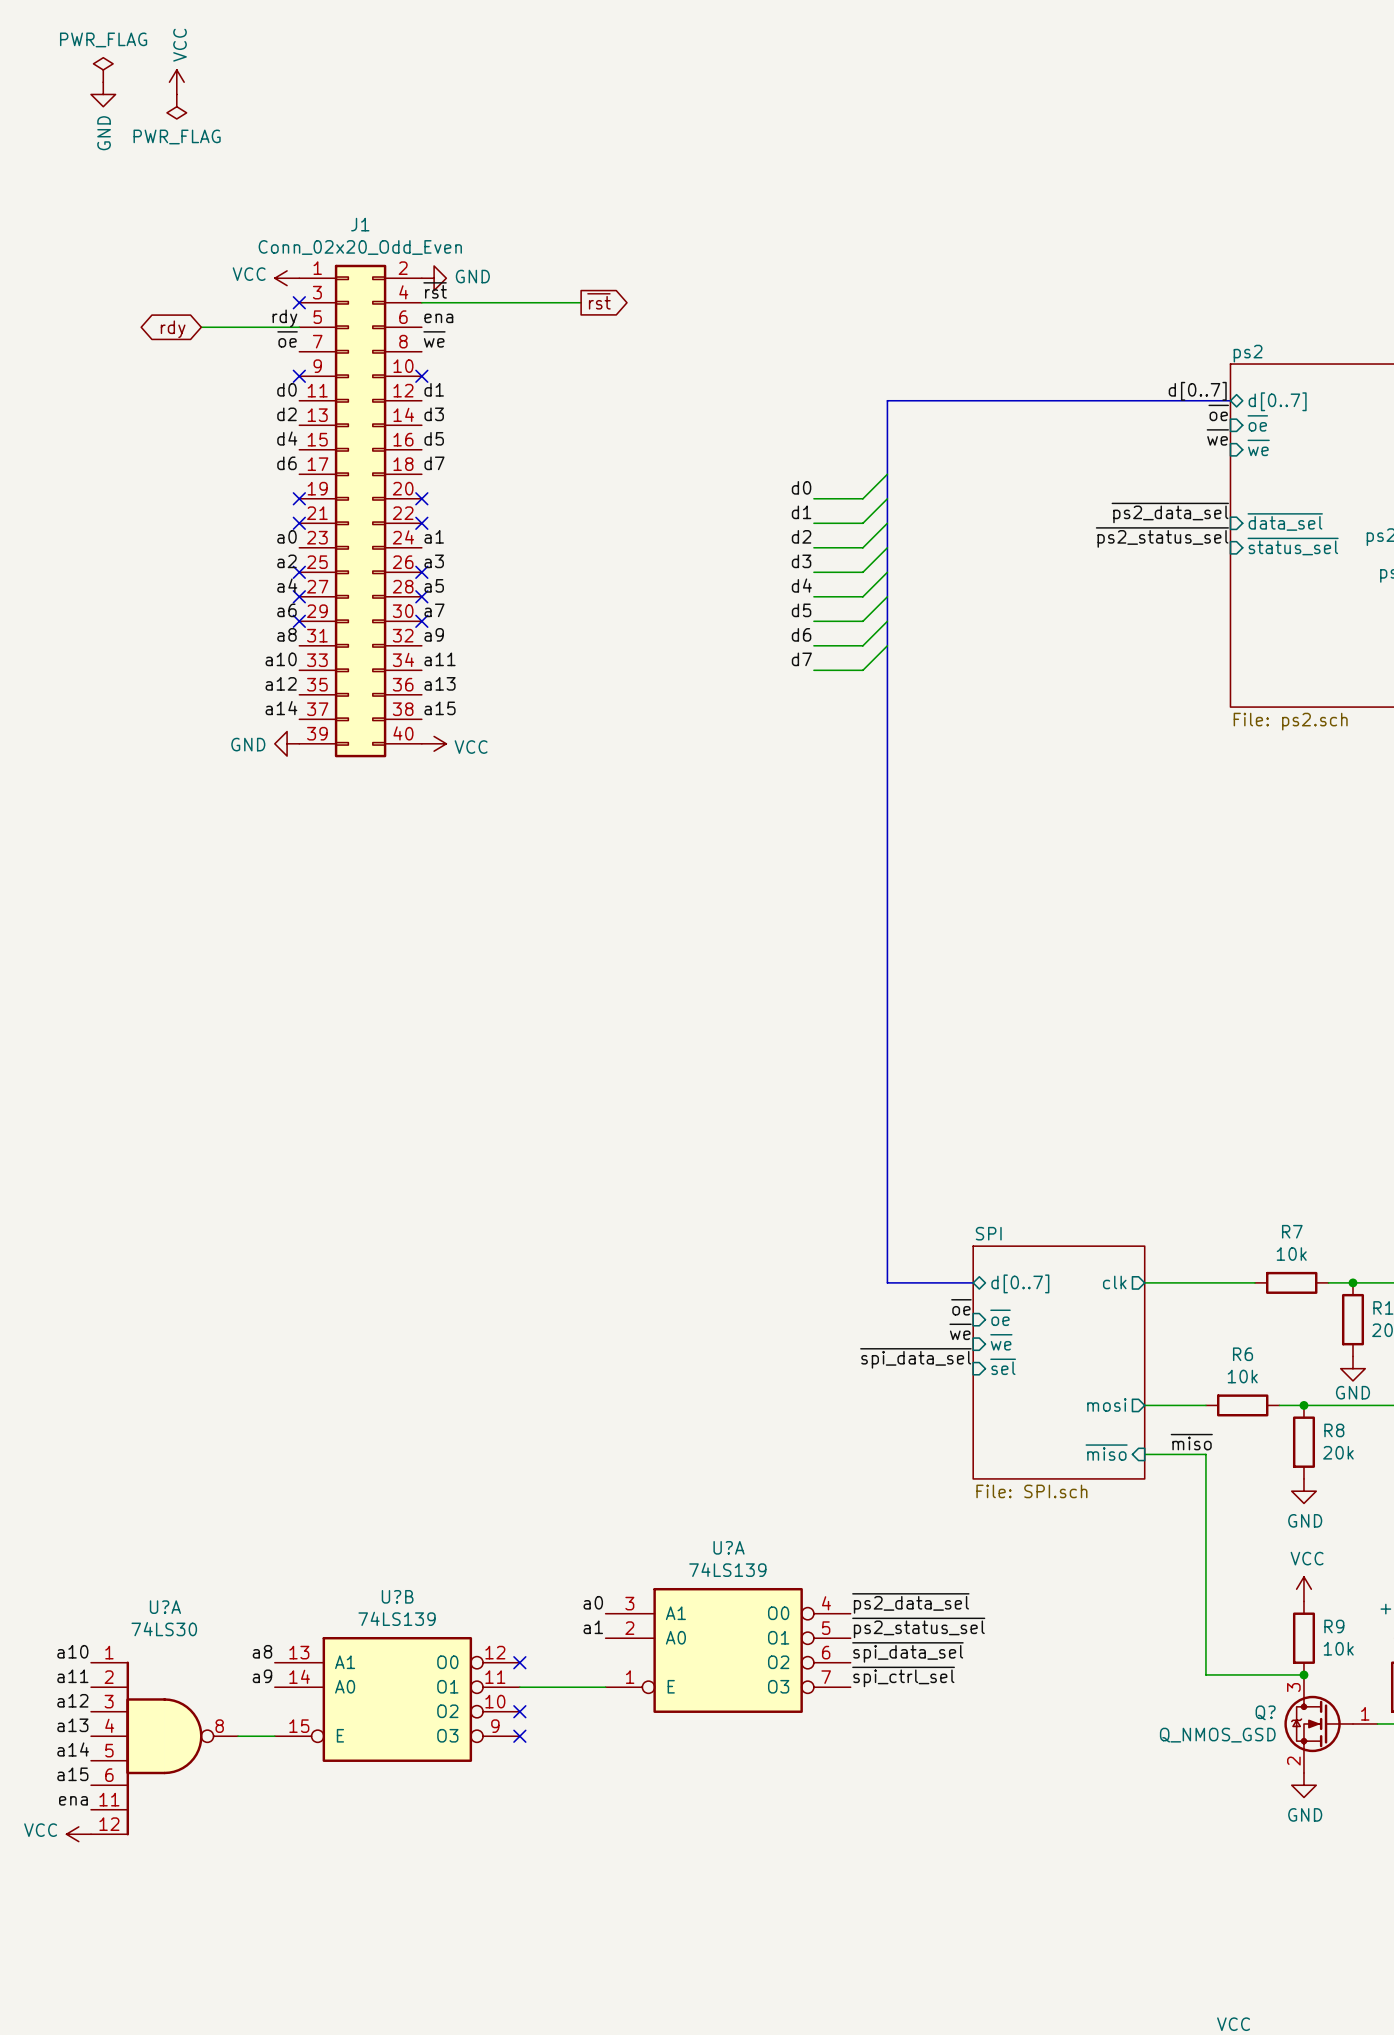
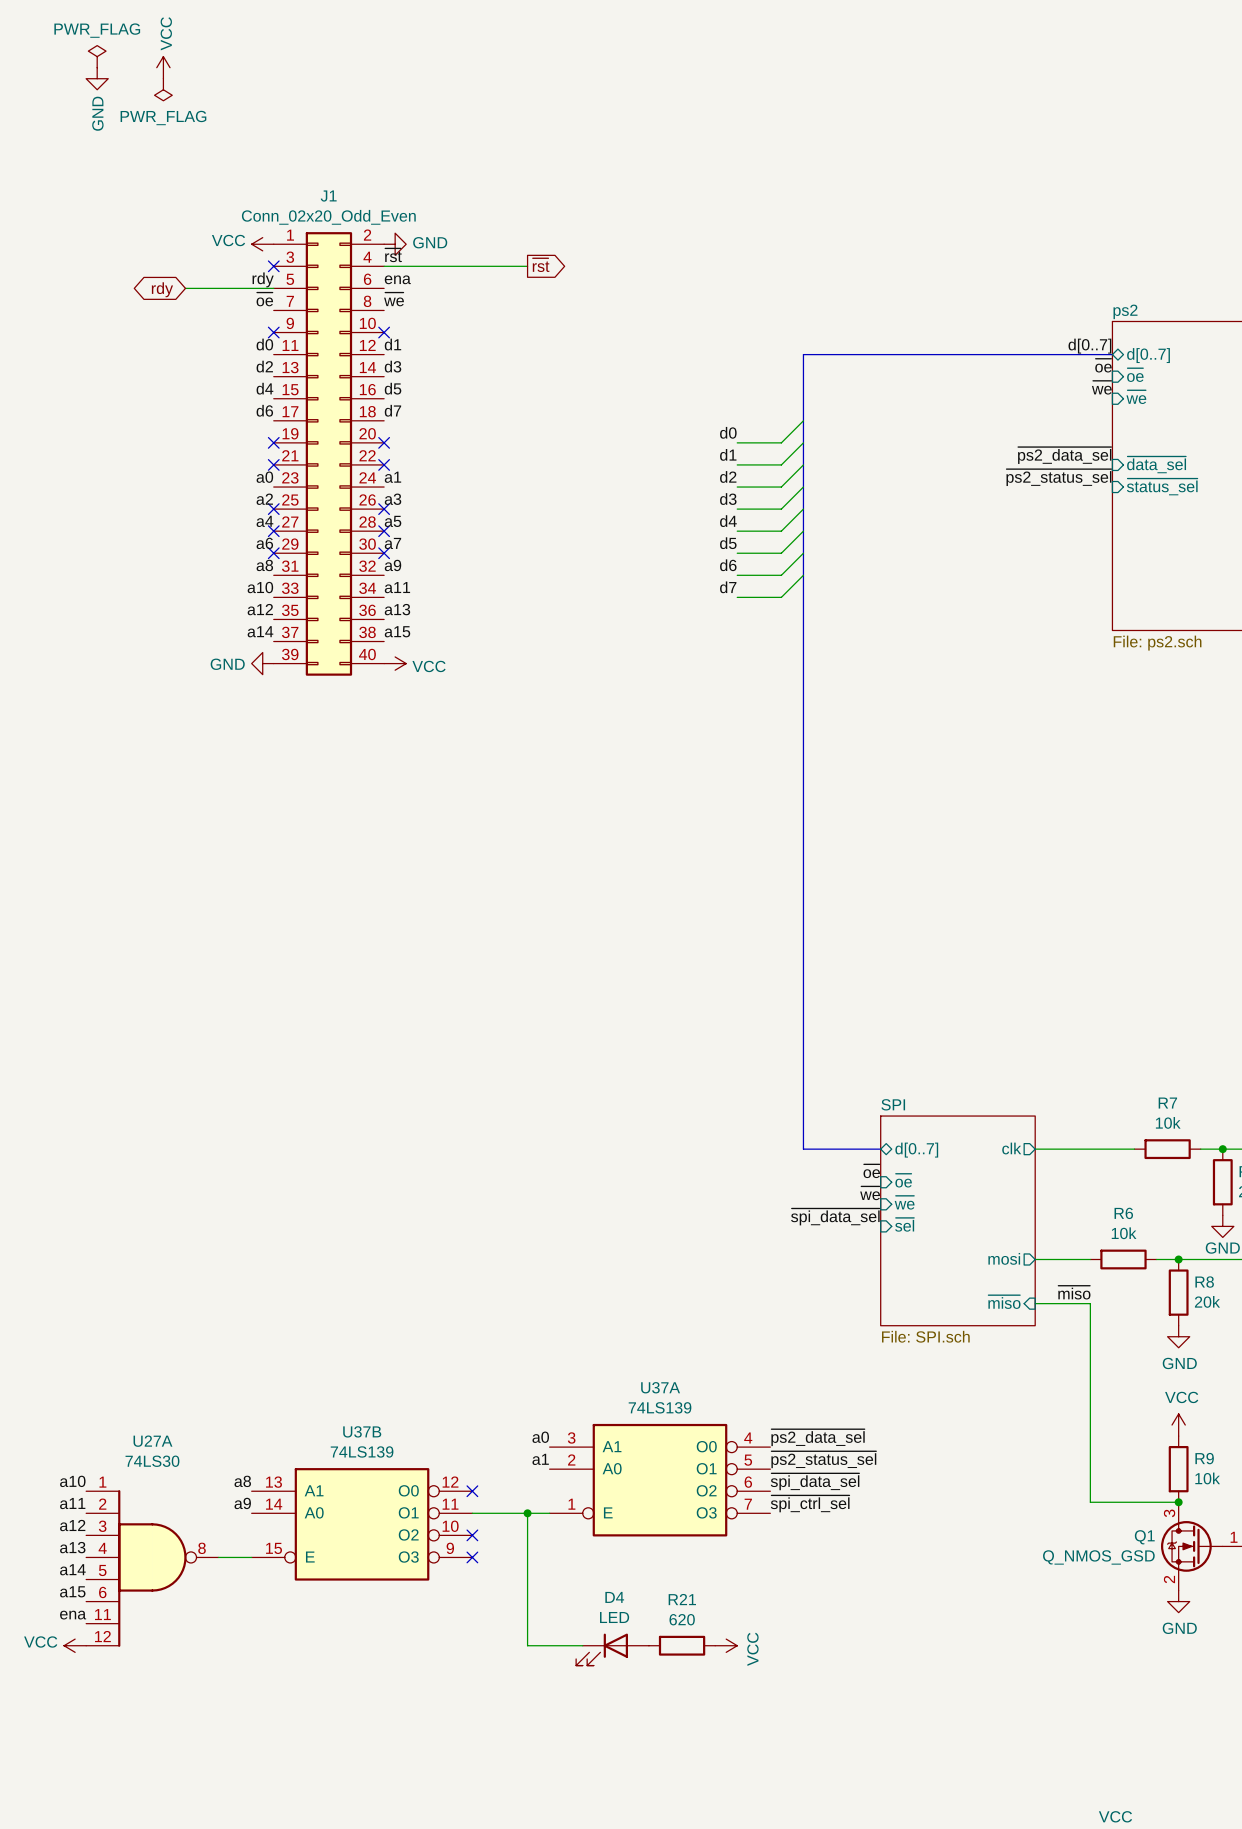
U?A name: U?A (729, 1547) -> U37A (660, 1387)
U?B name: U?B (397, 1596) -> U37B (362, 1431)
U?A name: U?A (165, 1607) -> U27A (152, 1441)
wire: none -> (527, 1513) (527, 1645) (582, 1645)
junction: none -> (527, 1513)
Q? name: Q? (1265, 1712) -> Q1 (1144, 1537)
R21: none -> 620 (682, 1645)
power symbol: none -> VCC (726, 1645)
D4: none -> LED (612, 1649)

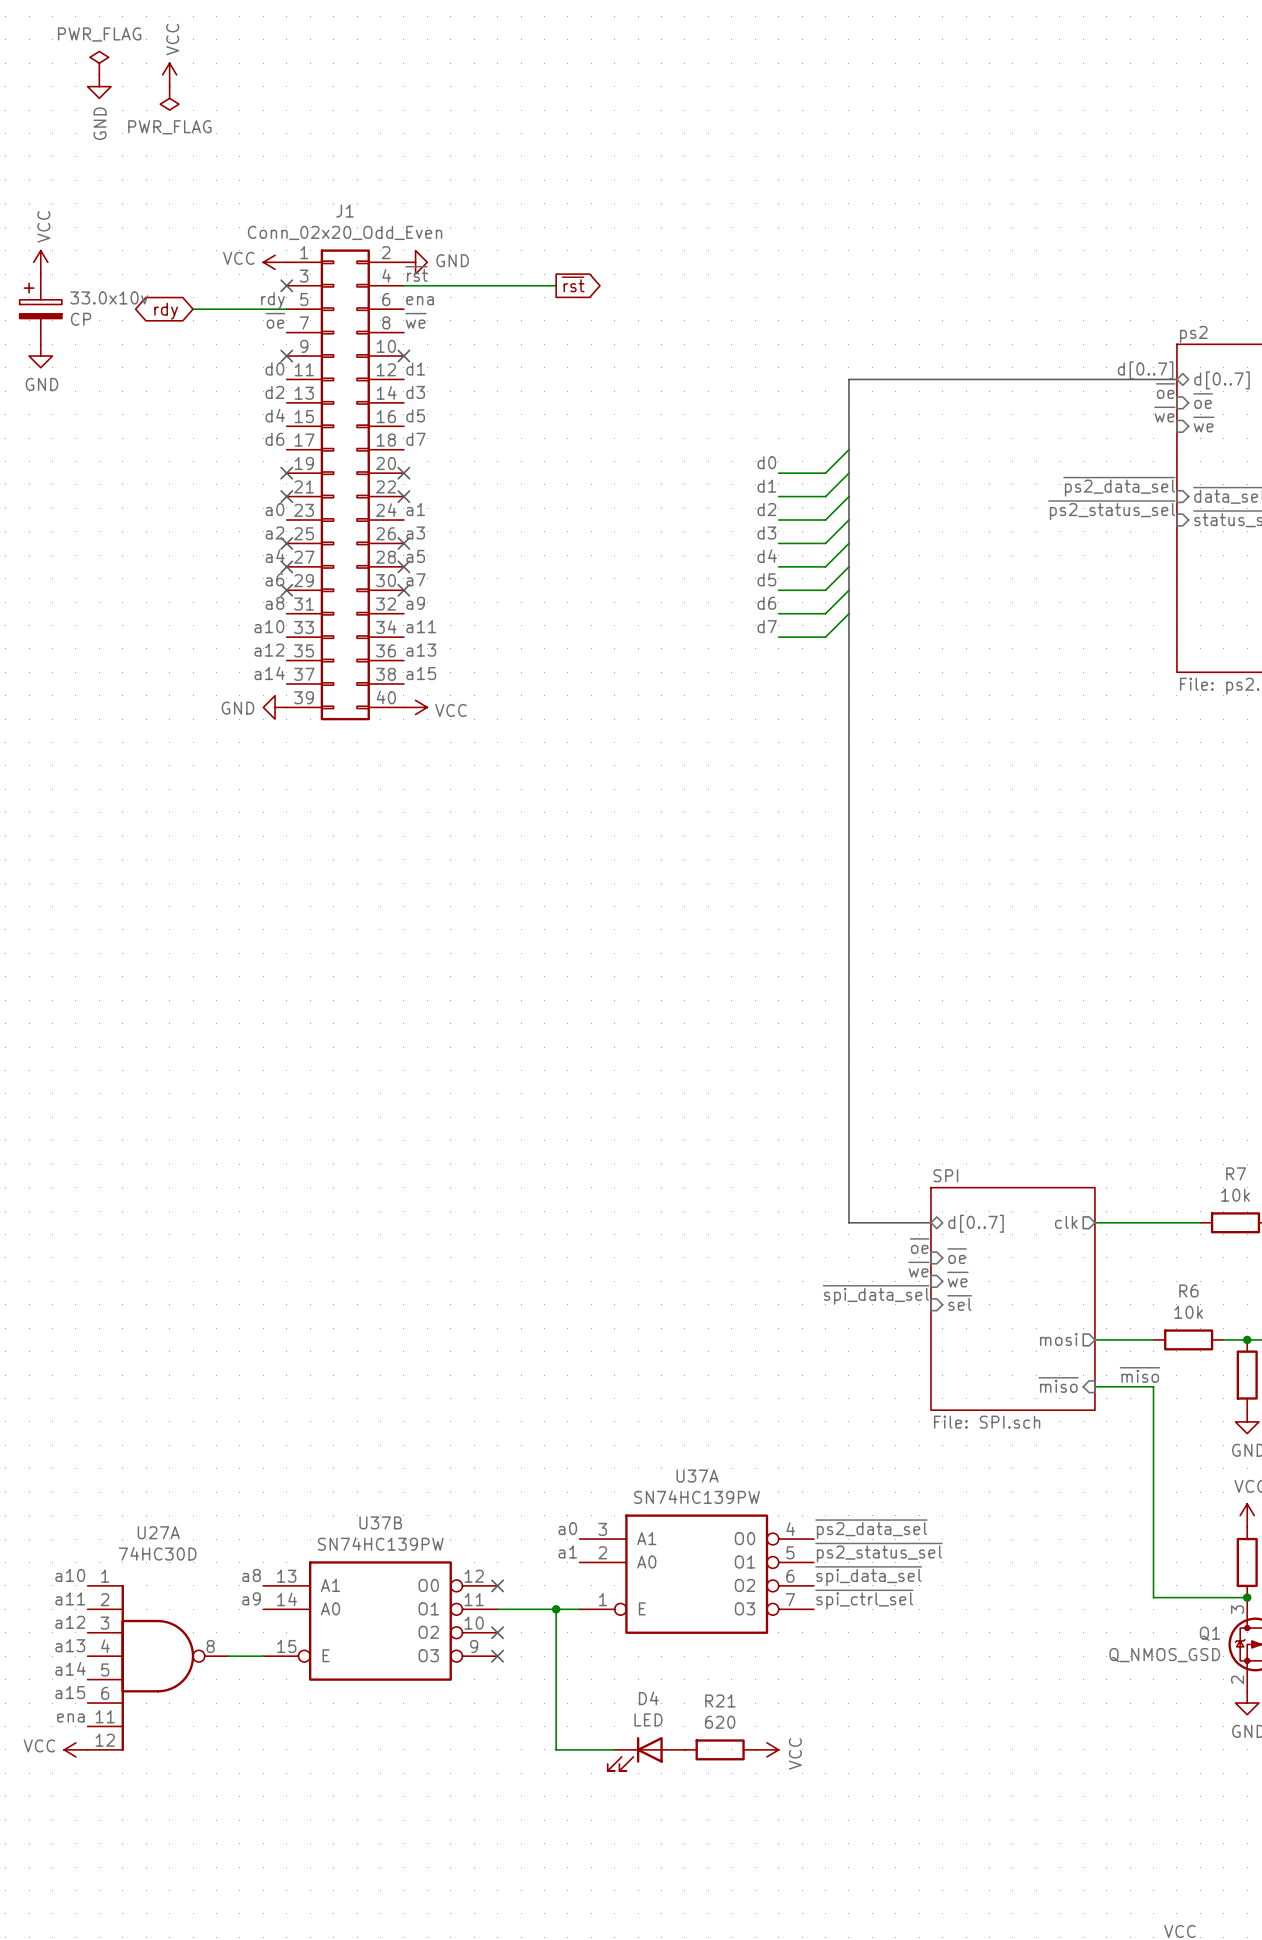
power symbol: none -> VCC (40, 262)
33.0x10v: none -> CP (40, 309)
power symbol: none -> GND (40, 356)
U37A value: 74LS139 (660, 1407) -> SN74HC139PW (696, 1497)
U37B value: 74LS139 (362, 1451) -> SN74HC139PW (380, 1543)
U27A value: 74LS30 (152, 1461) -> 74HC30D (157, 1553)

